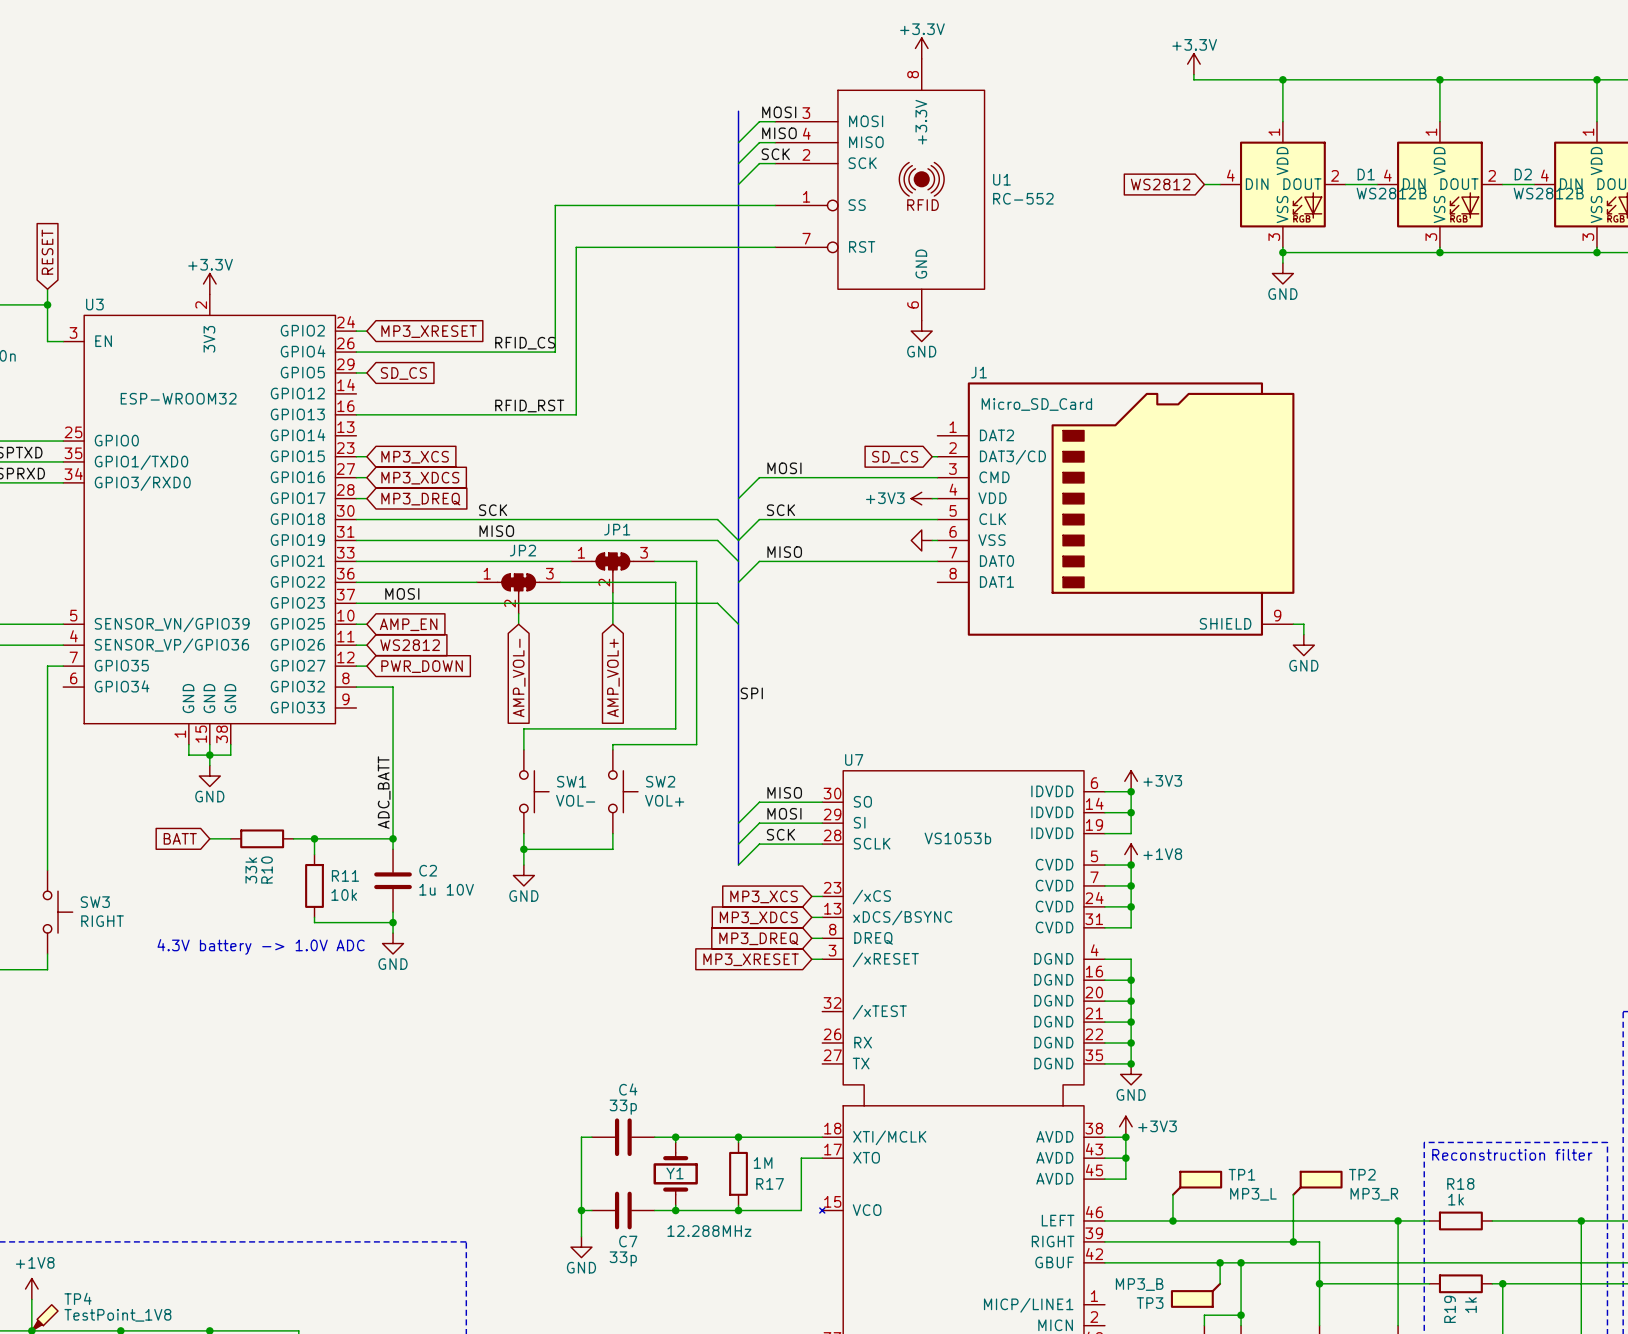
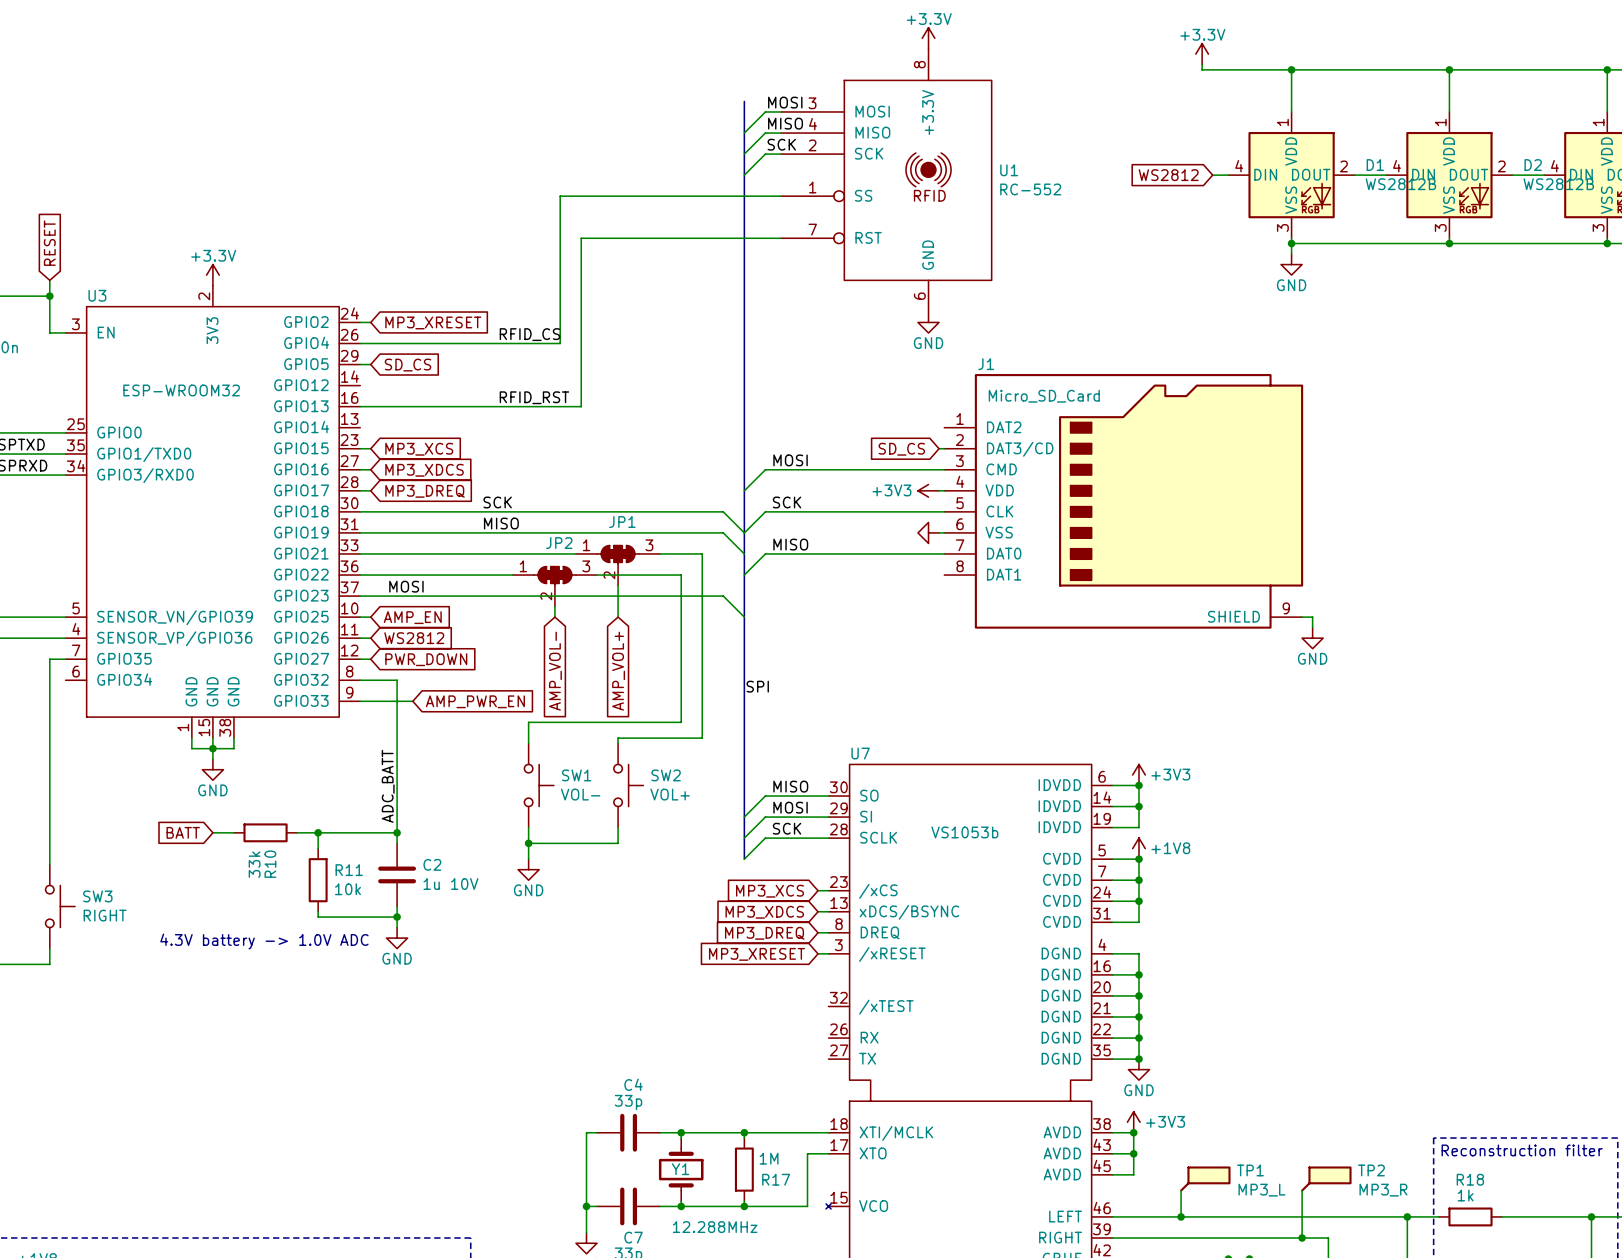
JP2 position: (518, 593) -> (554, 586)
wire: (518, 613) (518, 624) -> (554, 606) (554, 617)
global label position: AMP_VOL- (519, 677) -> AMP_VOL- (555, 671)
wire: none -> (360, 701) (412, 701)
global label: none -> AMP_PWR_EN (475, 701)

